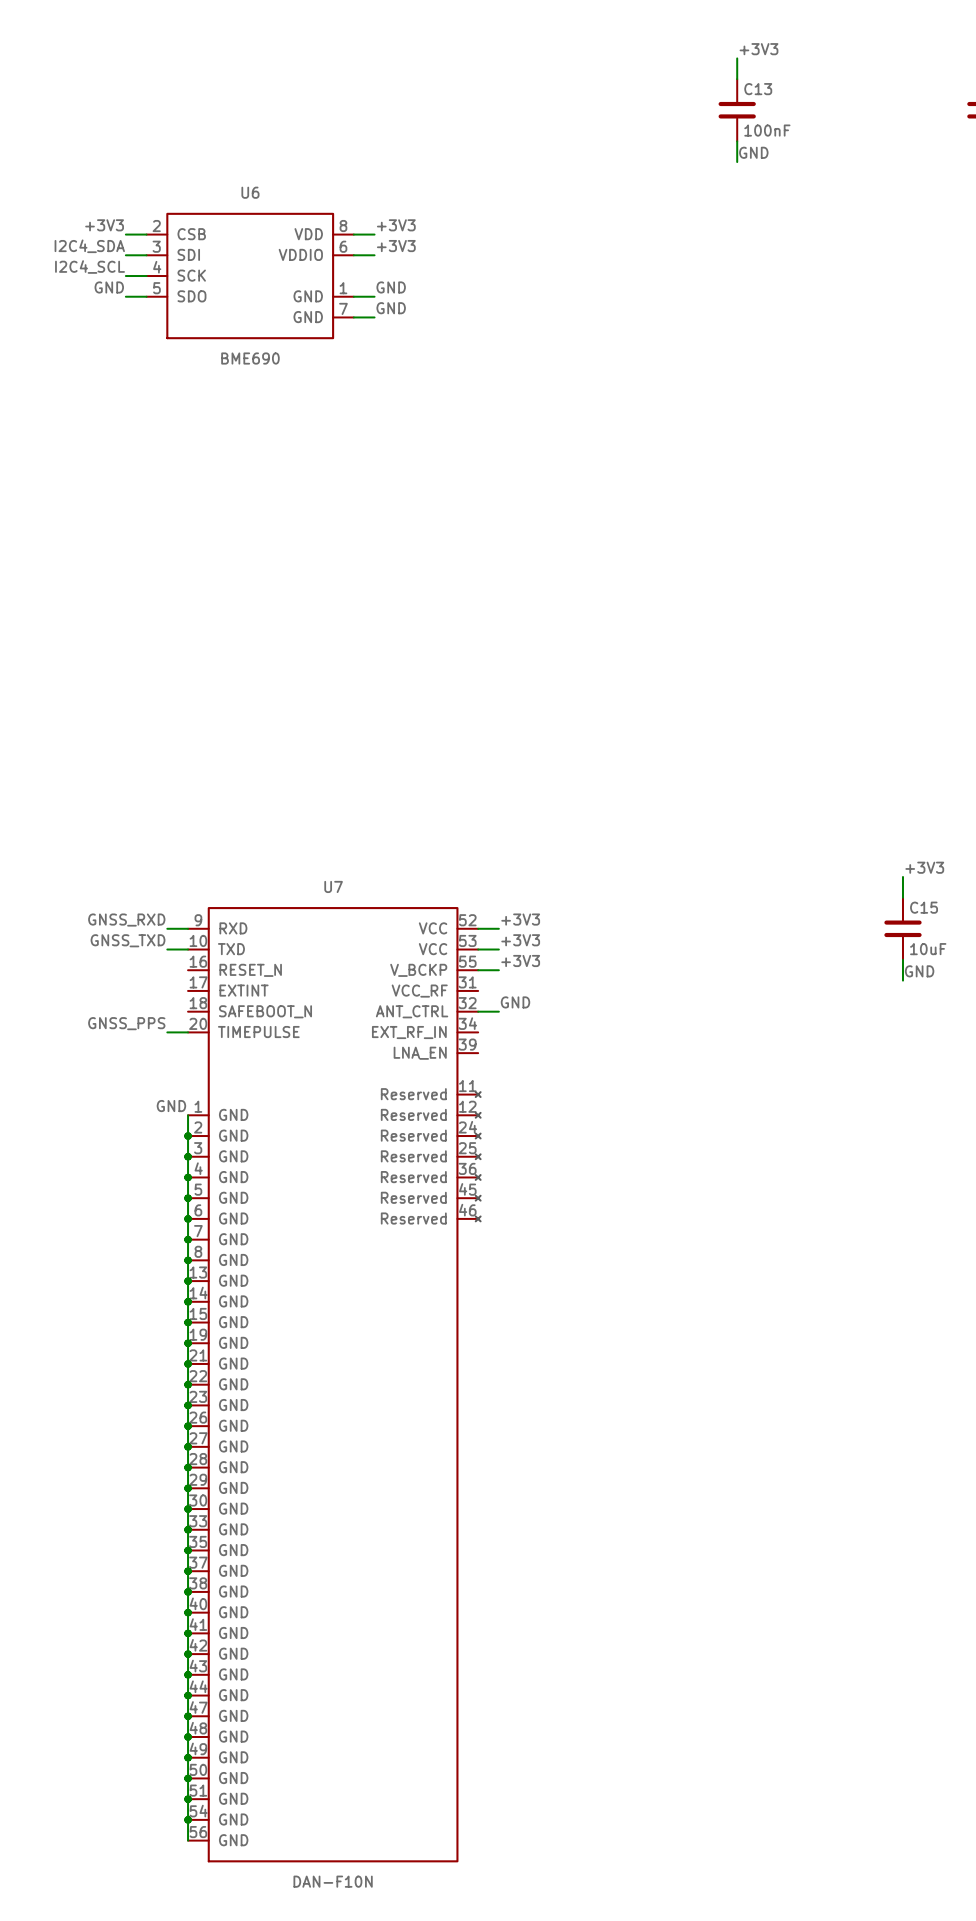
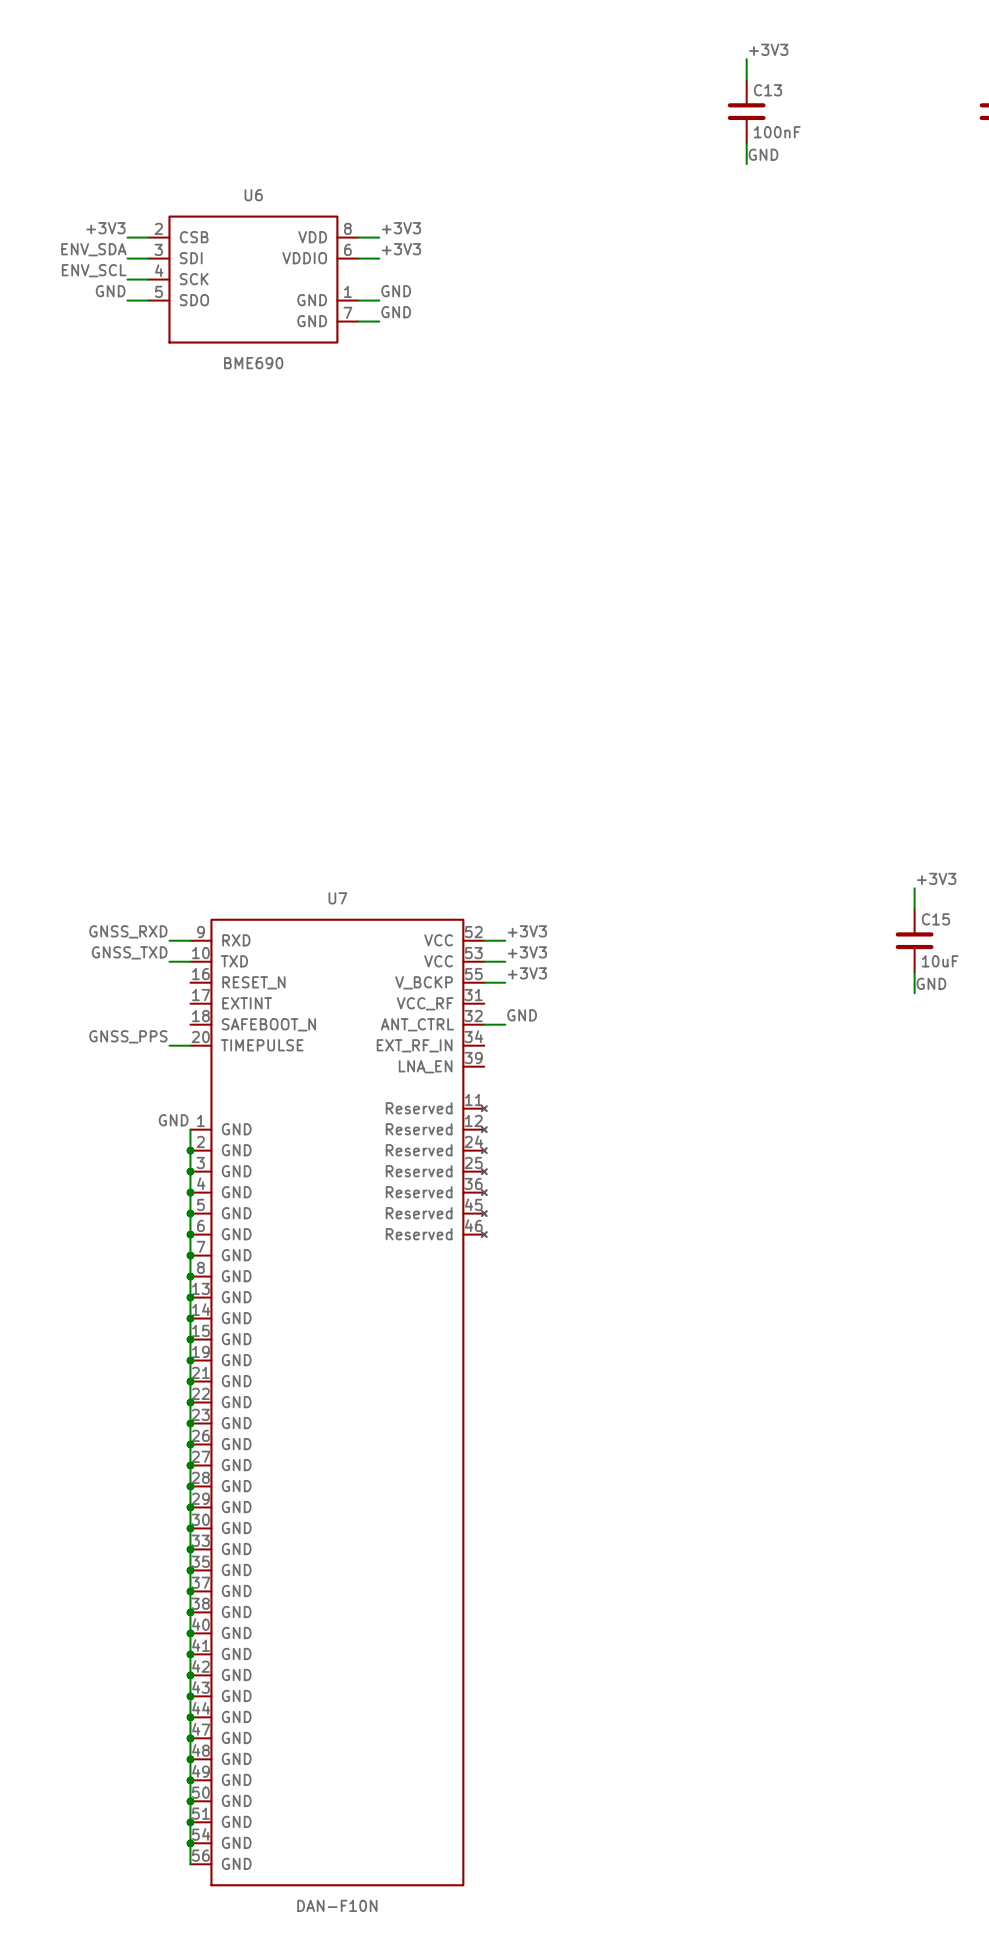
label: I2C4_SDA (89, 246) -> ENV_SDA (93, 249)
label: I2C4_SCL (90, 267) -> ENV_SCL (94, 270)

